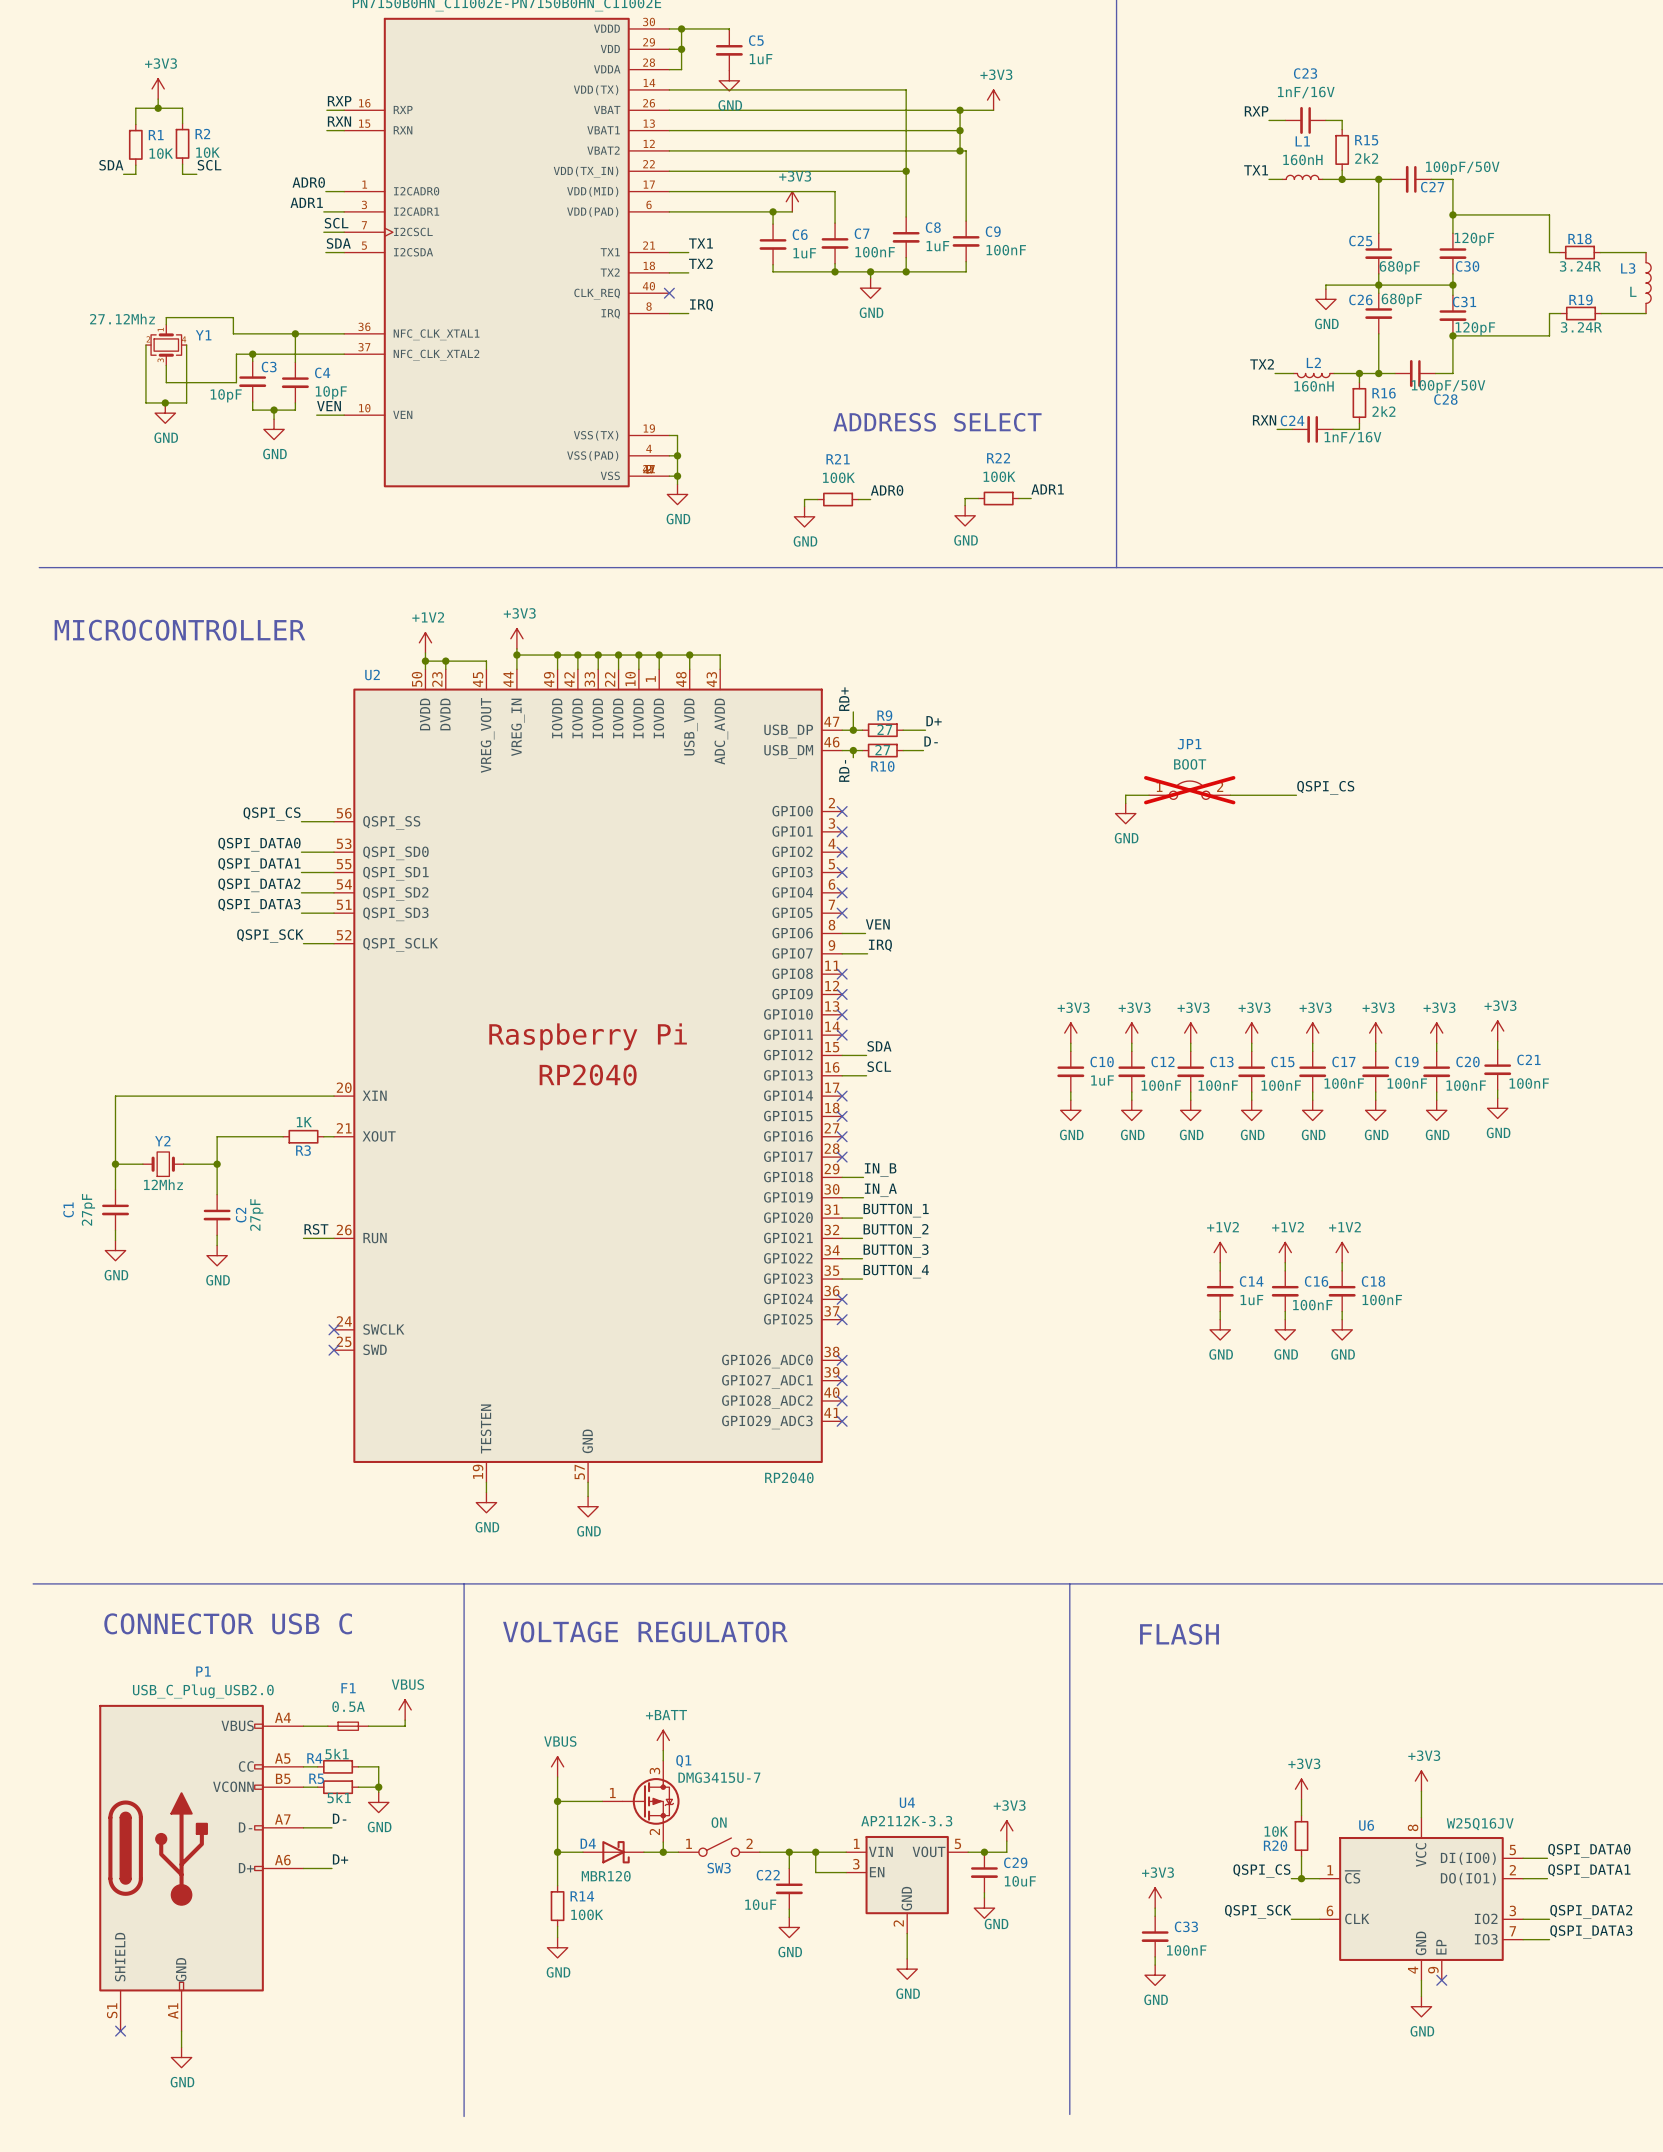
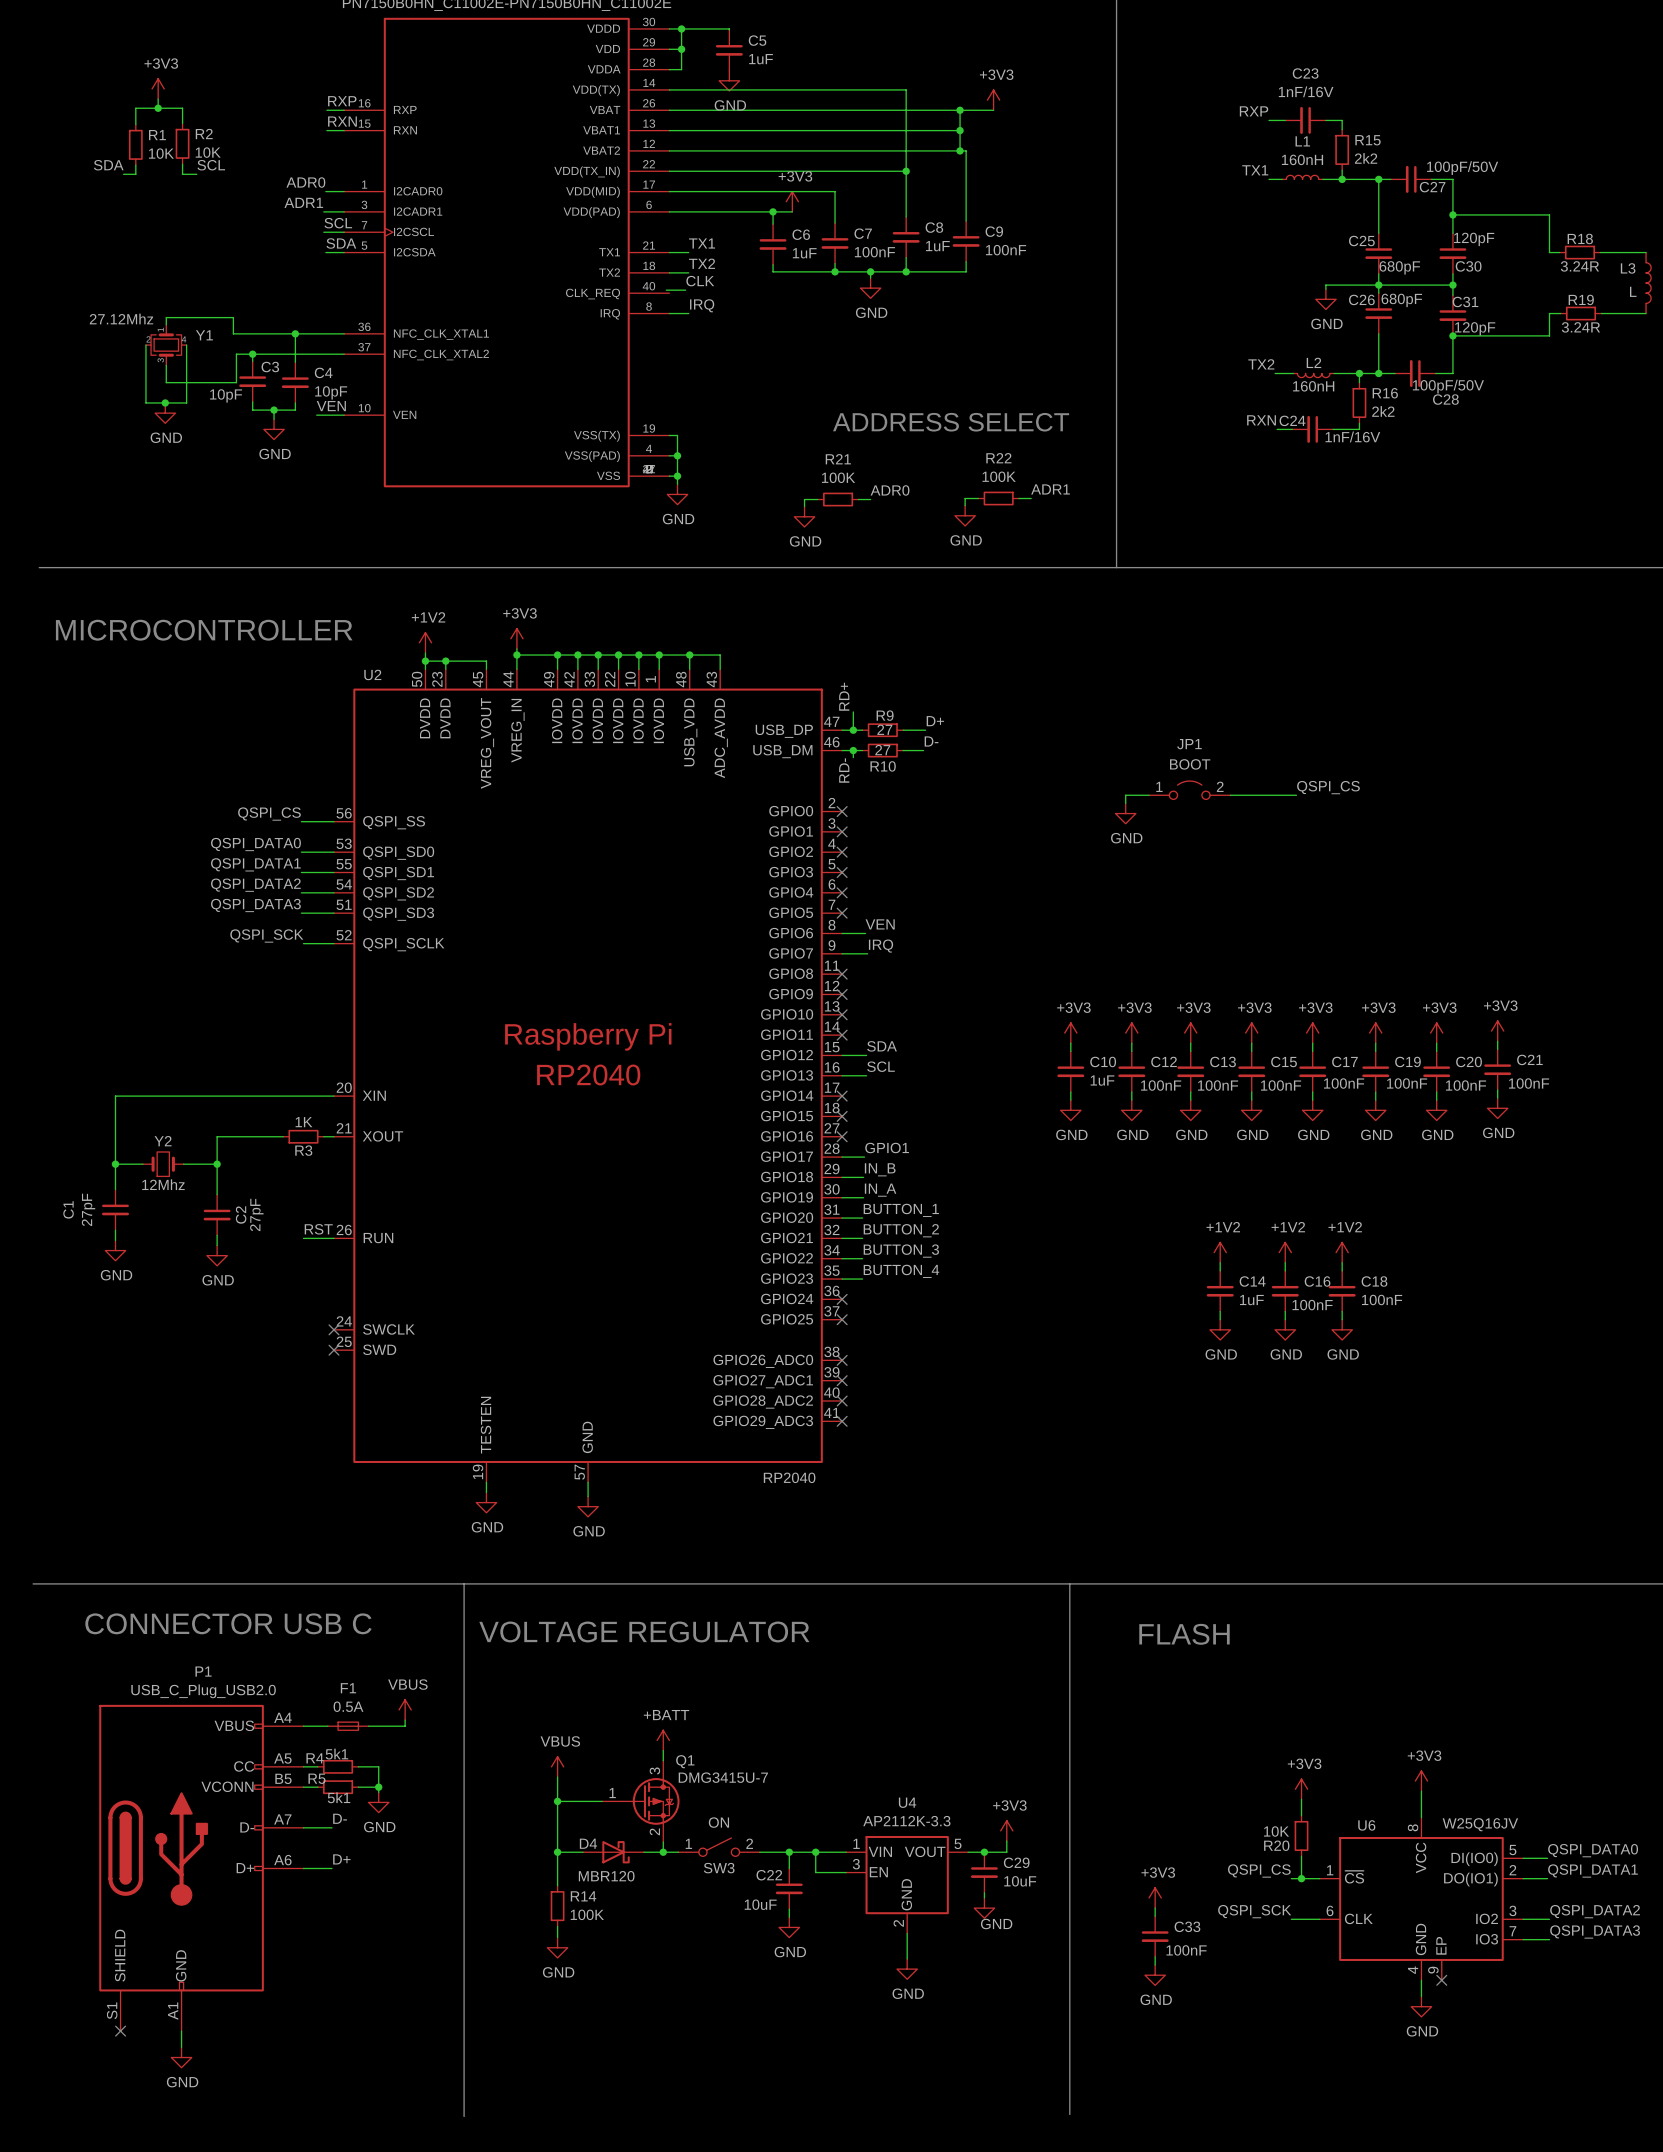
label: none -> CLK (700, 281)
wire: none -> (666, 290) (685, 290)
no-connect mark: (669, 293) -> none
JP1 do-not-place cross: (1189, 790) -> none
label: none -> GPIO1 (887, 1148)
wire: none -> (842, 1157) (864, 1157)
no-connect mark: (842, 1157) -> none

